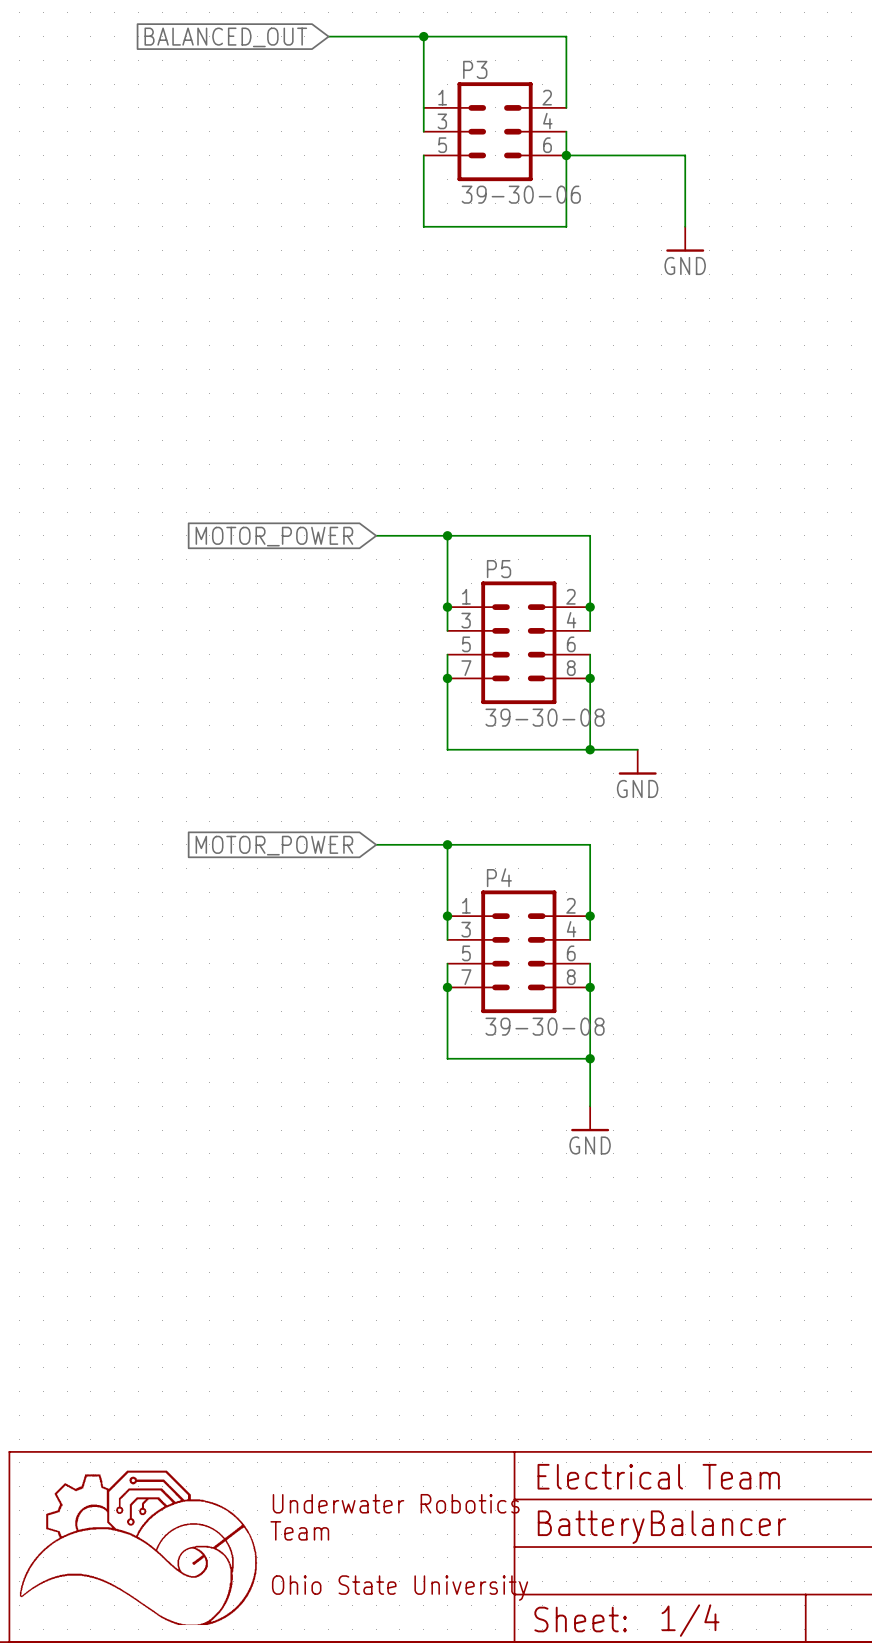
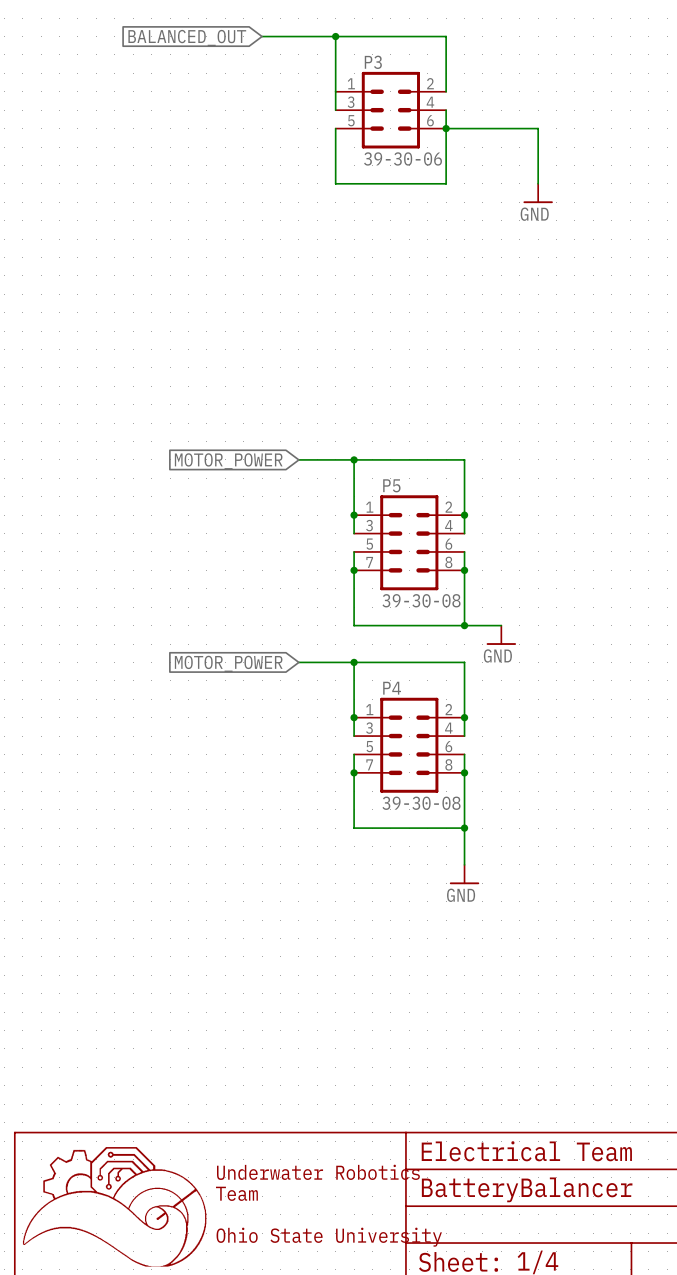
wire: (376, 535) (590, 535) (590, 583) -> (298, 459) (464, 459)
wire: (447, 535) (447, 583) -> none
junction: (447, 535) -> none
global label position: MOTOR_POWER (274, 536) -> MOTOR_POWER (228, 461)
junction: none -> (354, 459)
junction: (447, 607) -> none
junction: (590, 607) -> none
P5 position: (518, 642) -> (409, 542)
junction: none -> (354, 515)
junction: none -> (464, 515)
wire: (447, 678) (447, 702) -> (354, 496) (354, 515)
junction: (447, 678) -> none
wire: (590, 678) (590, 702) -> (464, 496) (464, 515)
junction: (590, 678) -> none
junction: none -> (354, 570)
junction: none -> (464, 570)
wire: (447, 749) (637, 749) -> (354, 588) (354, 625) (501, 625)
wire: none -> (464, 588) (464, 625)
junction: (590, 749) -> none
power symbol position: GND (637, 762) -> GND (501, 635)
junction: none -> (464, 625)

